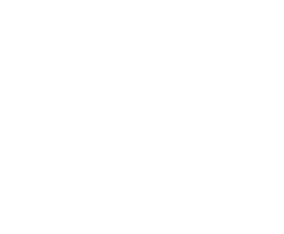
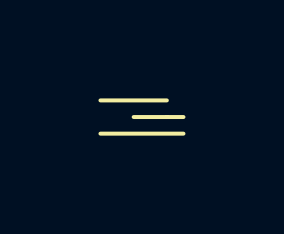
line: none -> (100, 100) (166, 100)
line: none -> (133, 117) (183, 117)
line: none -> (100, 133) (183, 133)

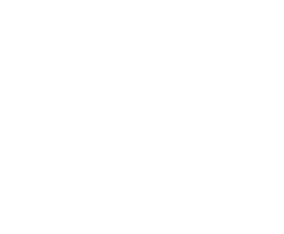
line: (100, 100) (166, 100) -> none
line: (133, 117) (183, 117) -> none
line: (100, 133) (183, 133) -> none

